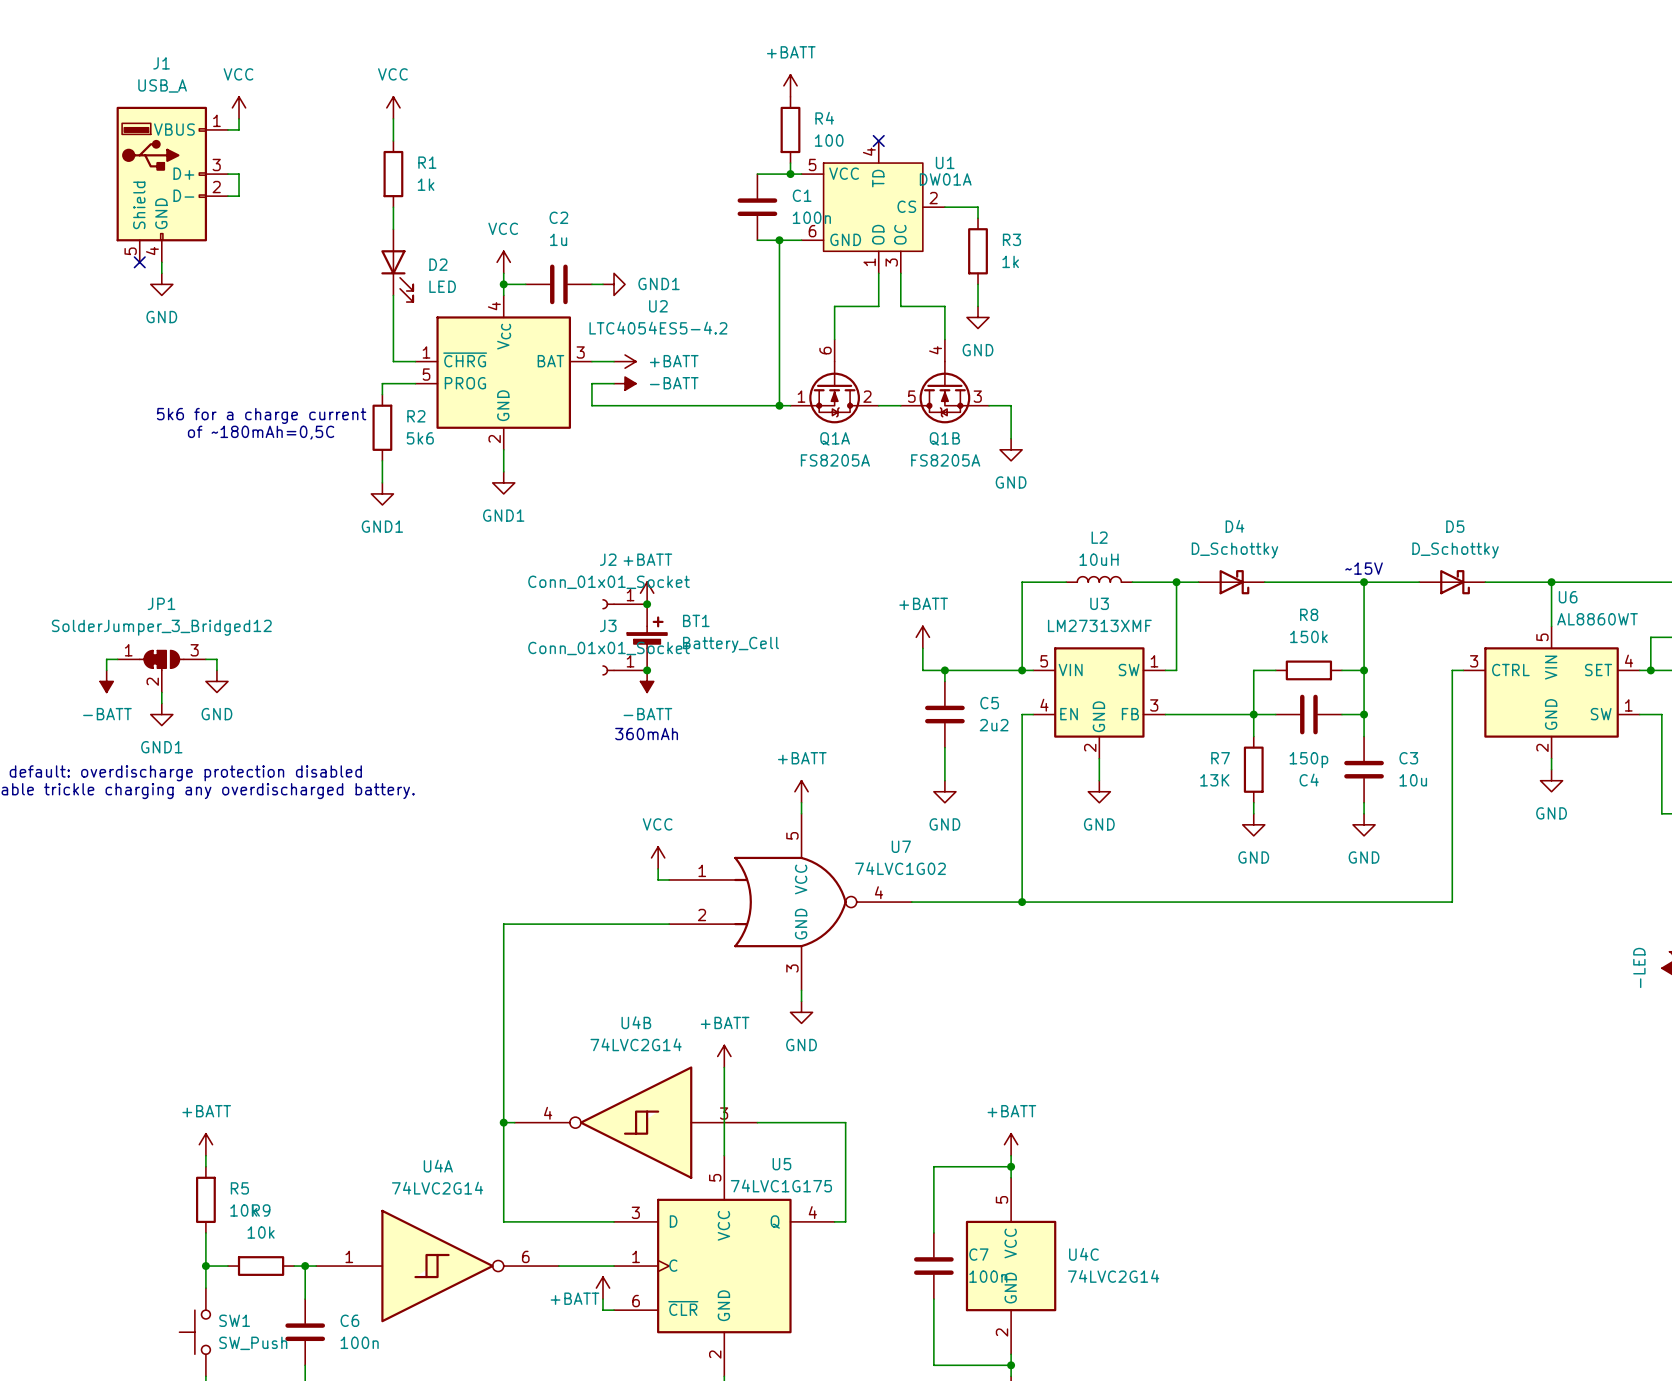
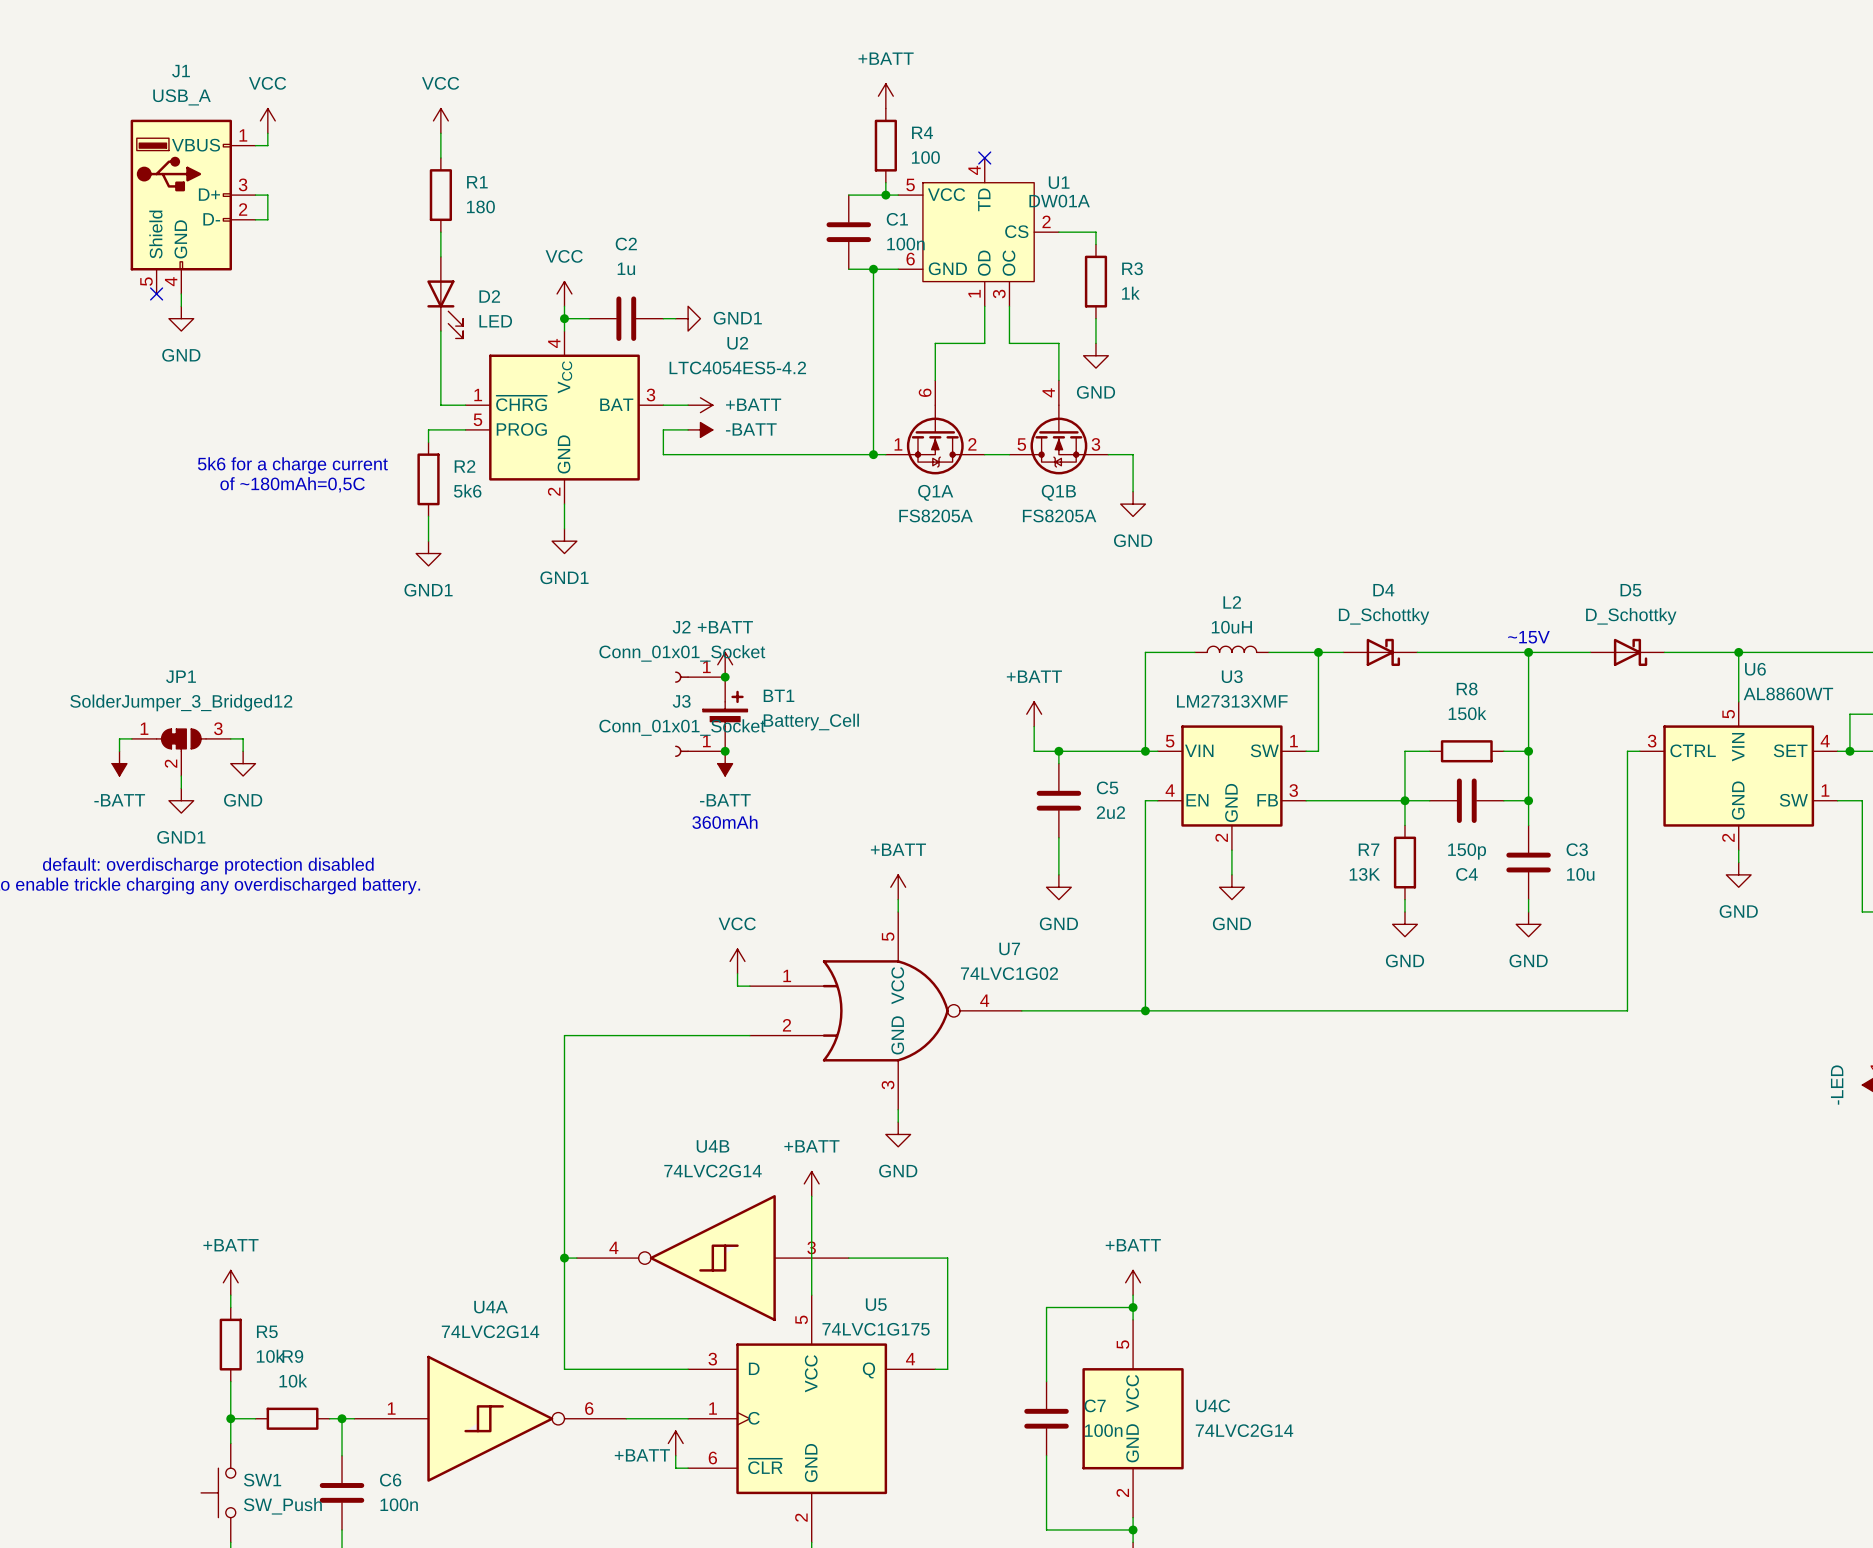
R1 value: 1k (426, 184) -> 180 (480, 206)

